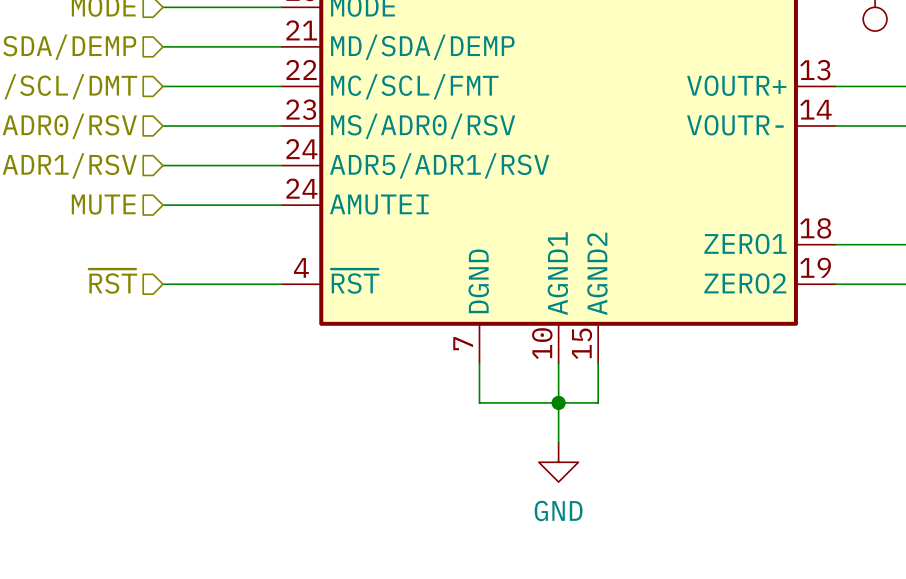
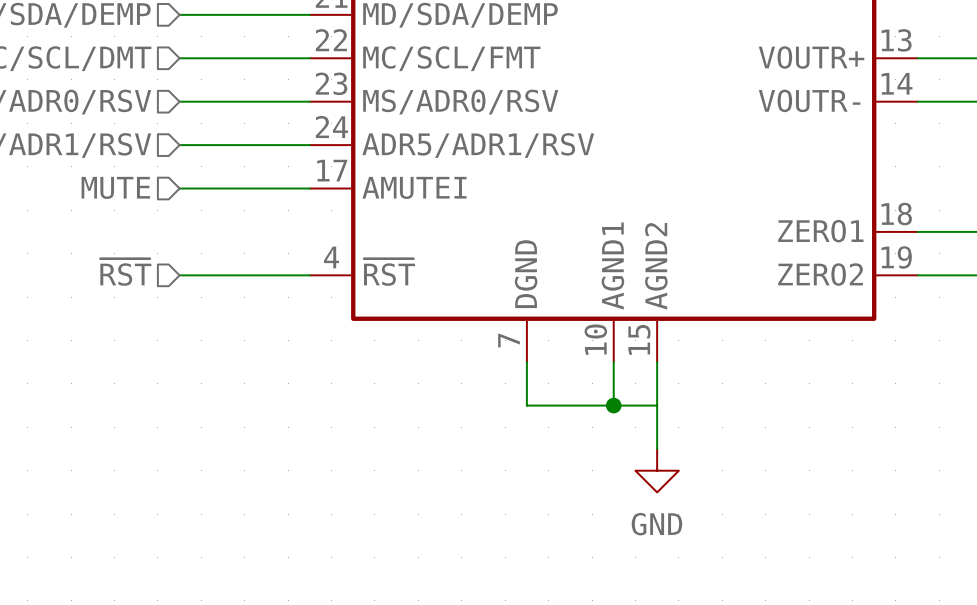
part pin number: 24 (301, 188) -> 17 (332, 170)
wire: (558, 402) (558, 442) -> (657, 405) (657, 448)
power symbol position: GND (558, 462) -> GND (657, 470)

